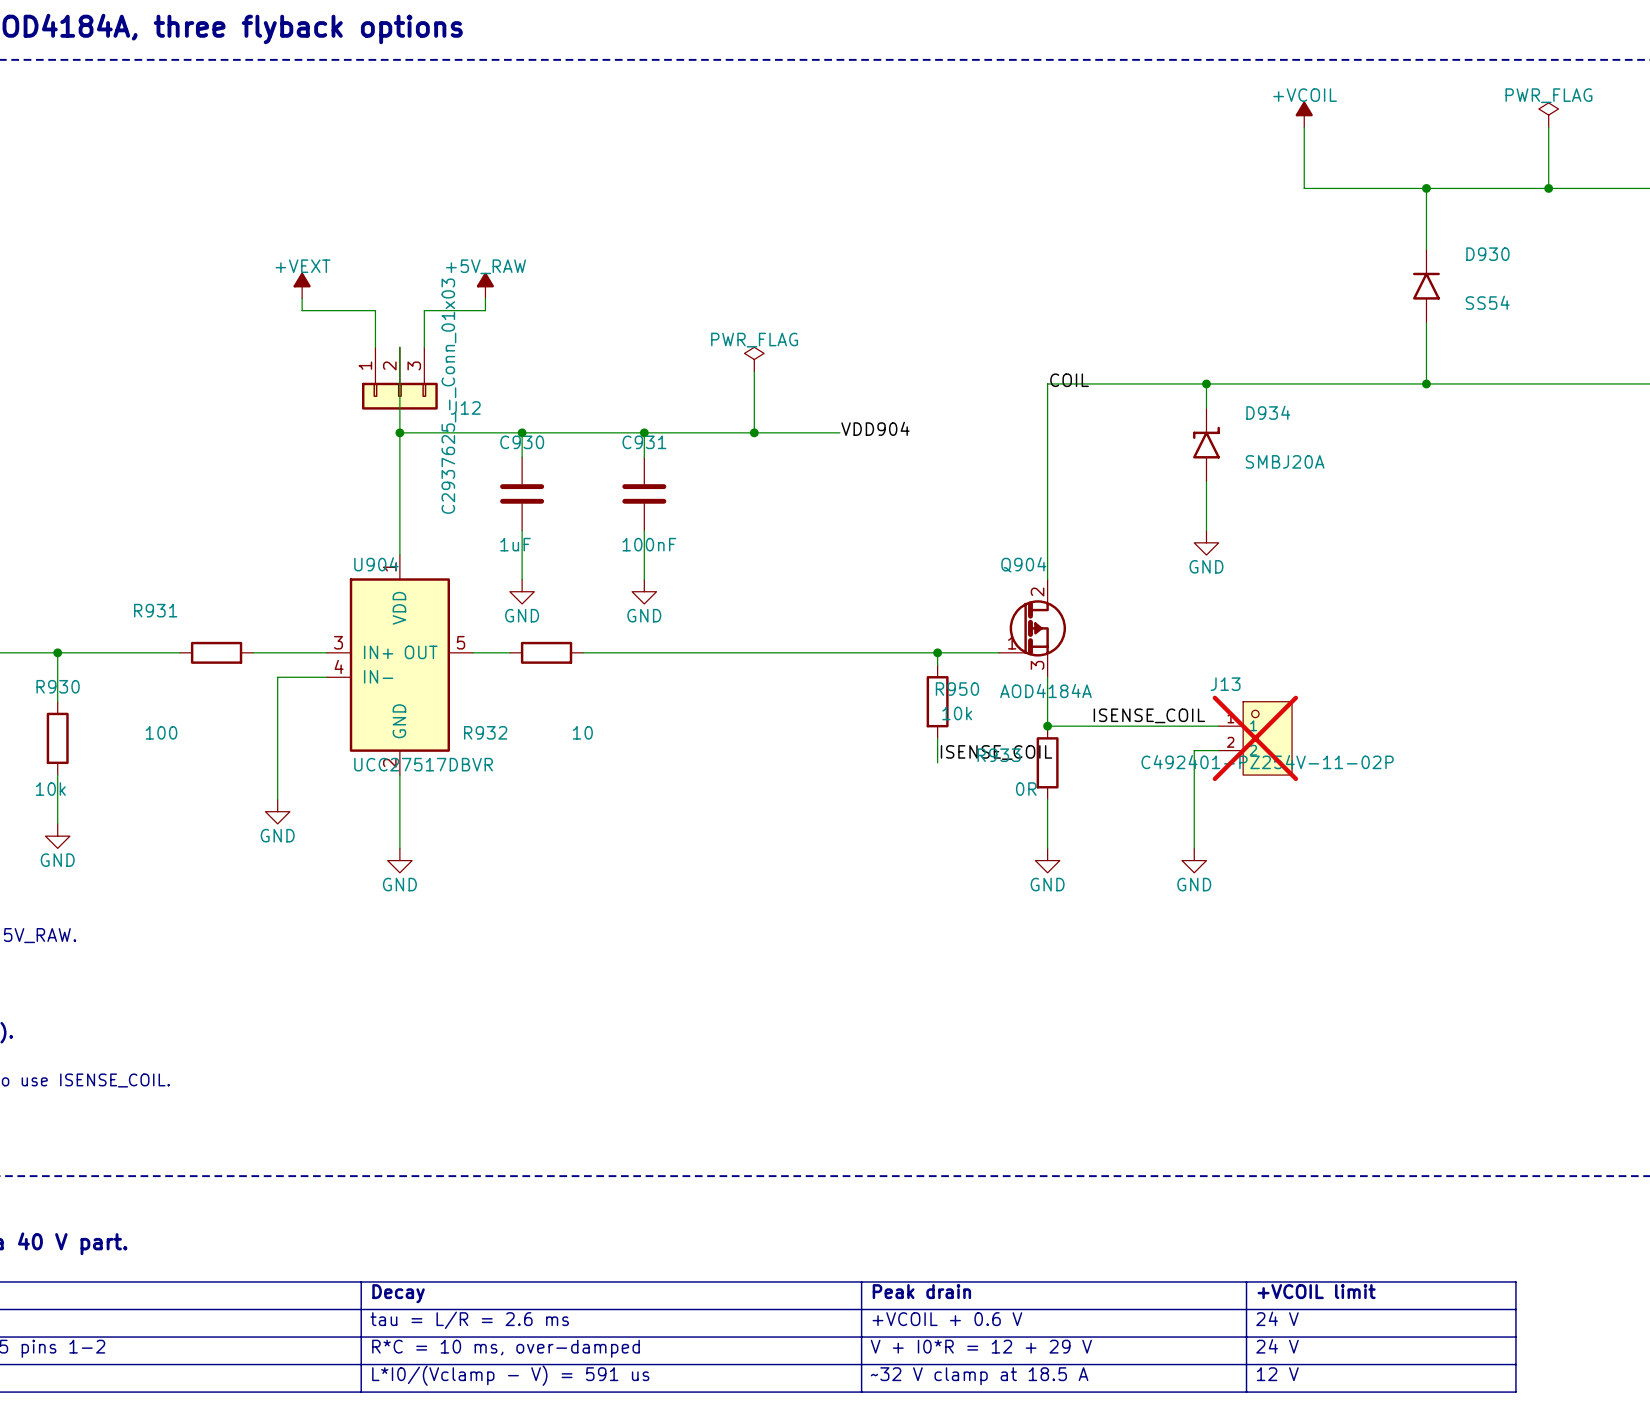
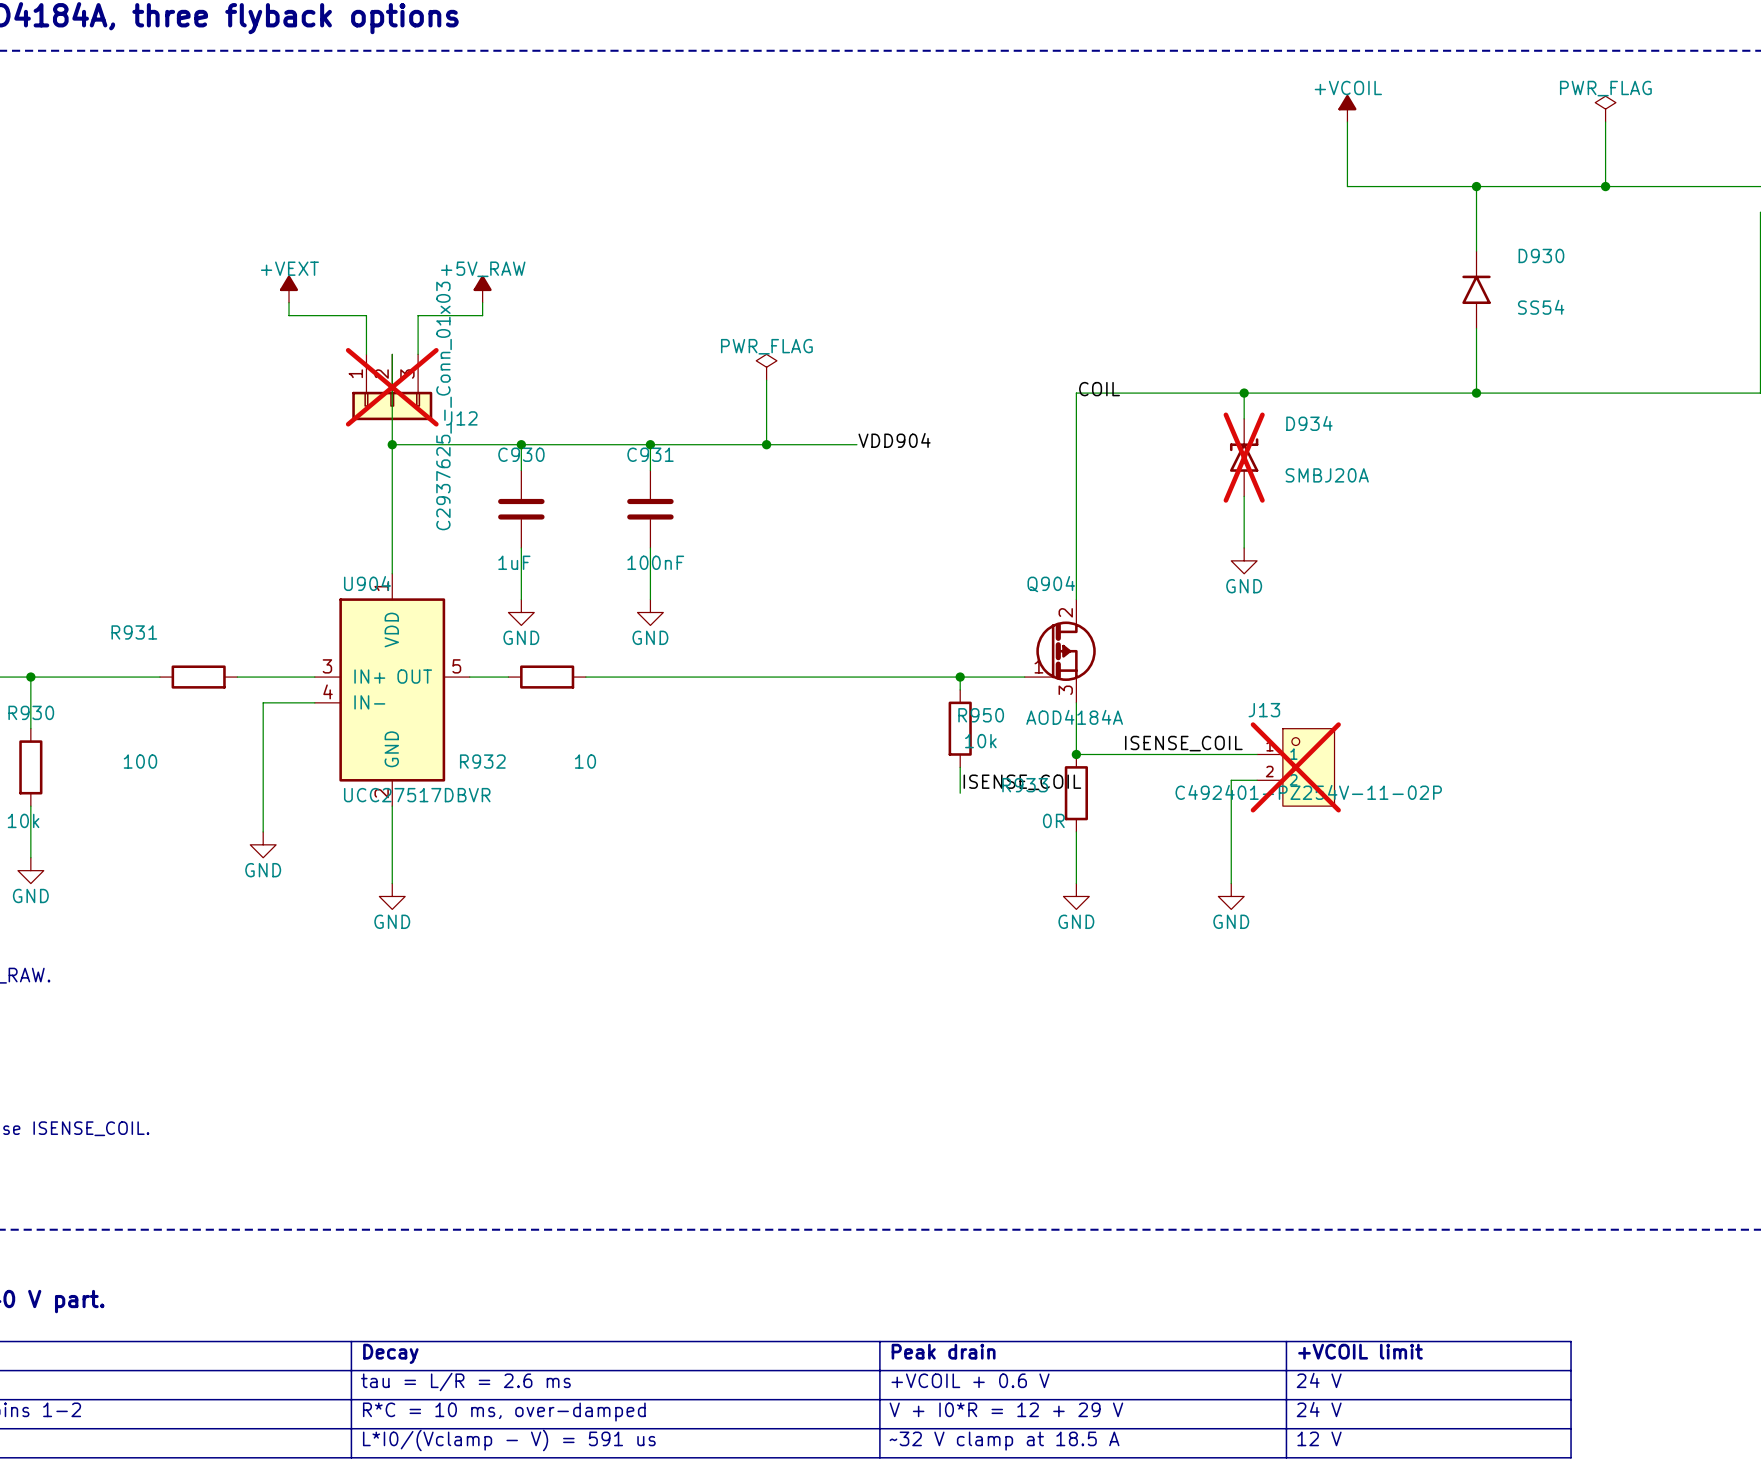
J12 do-not-place cross: none -> (392, 387)
D934 do-not-place cross: none -> (1244, 457)

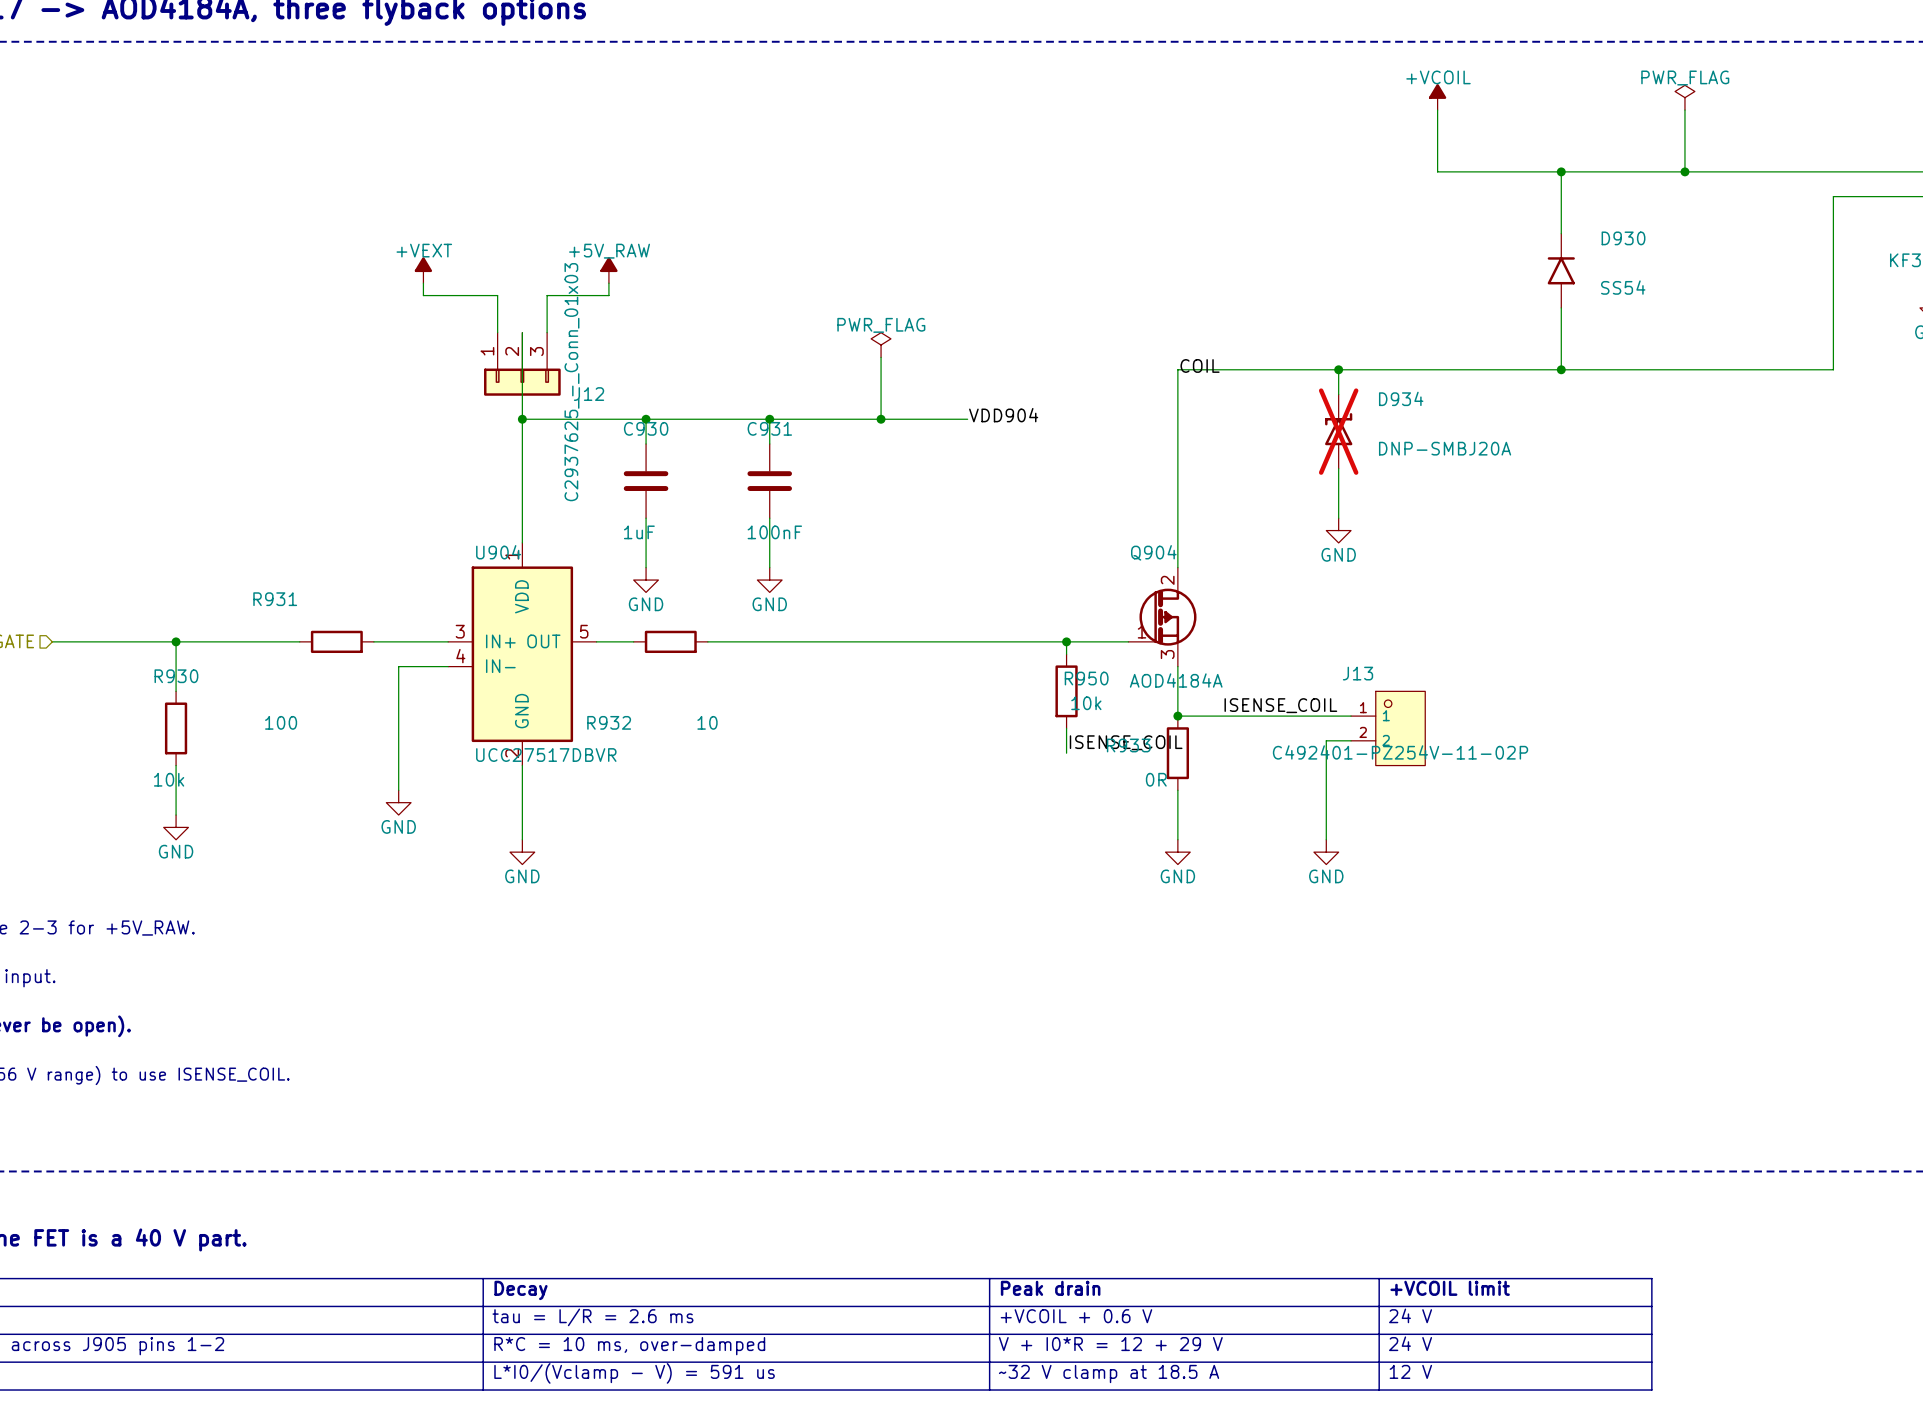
J12 do-not-place cross: (392, 387) -> none
D934 value: SMBJ20A (1327, 475) -> DNP-SMBJ20A (1445, 448)
J13 do-not-place cross: (1295, 767) -> none

